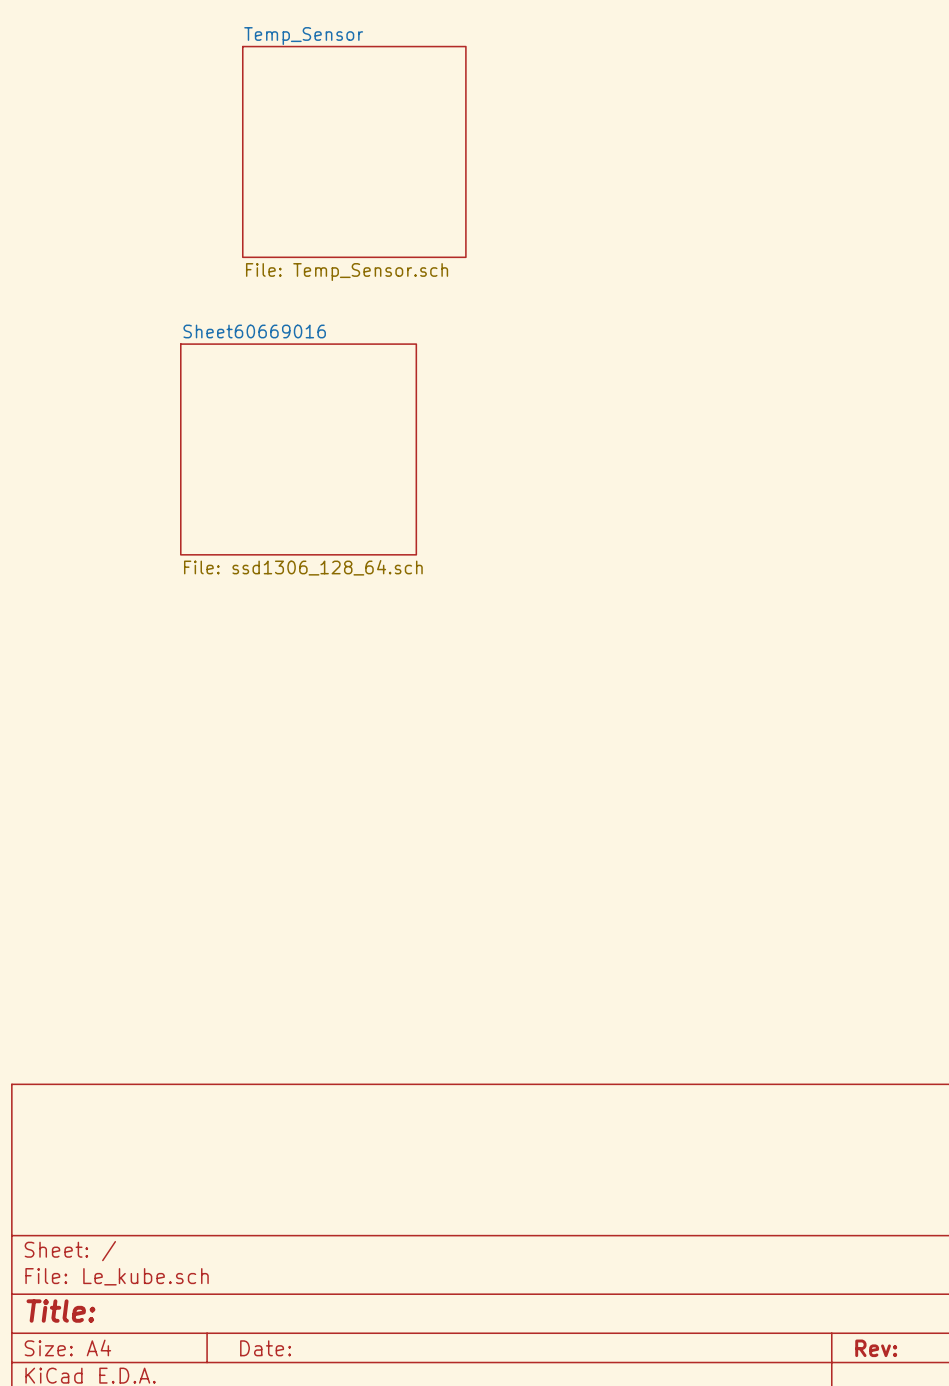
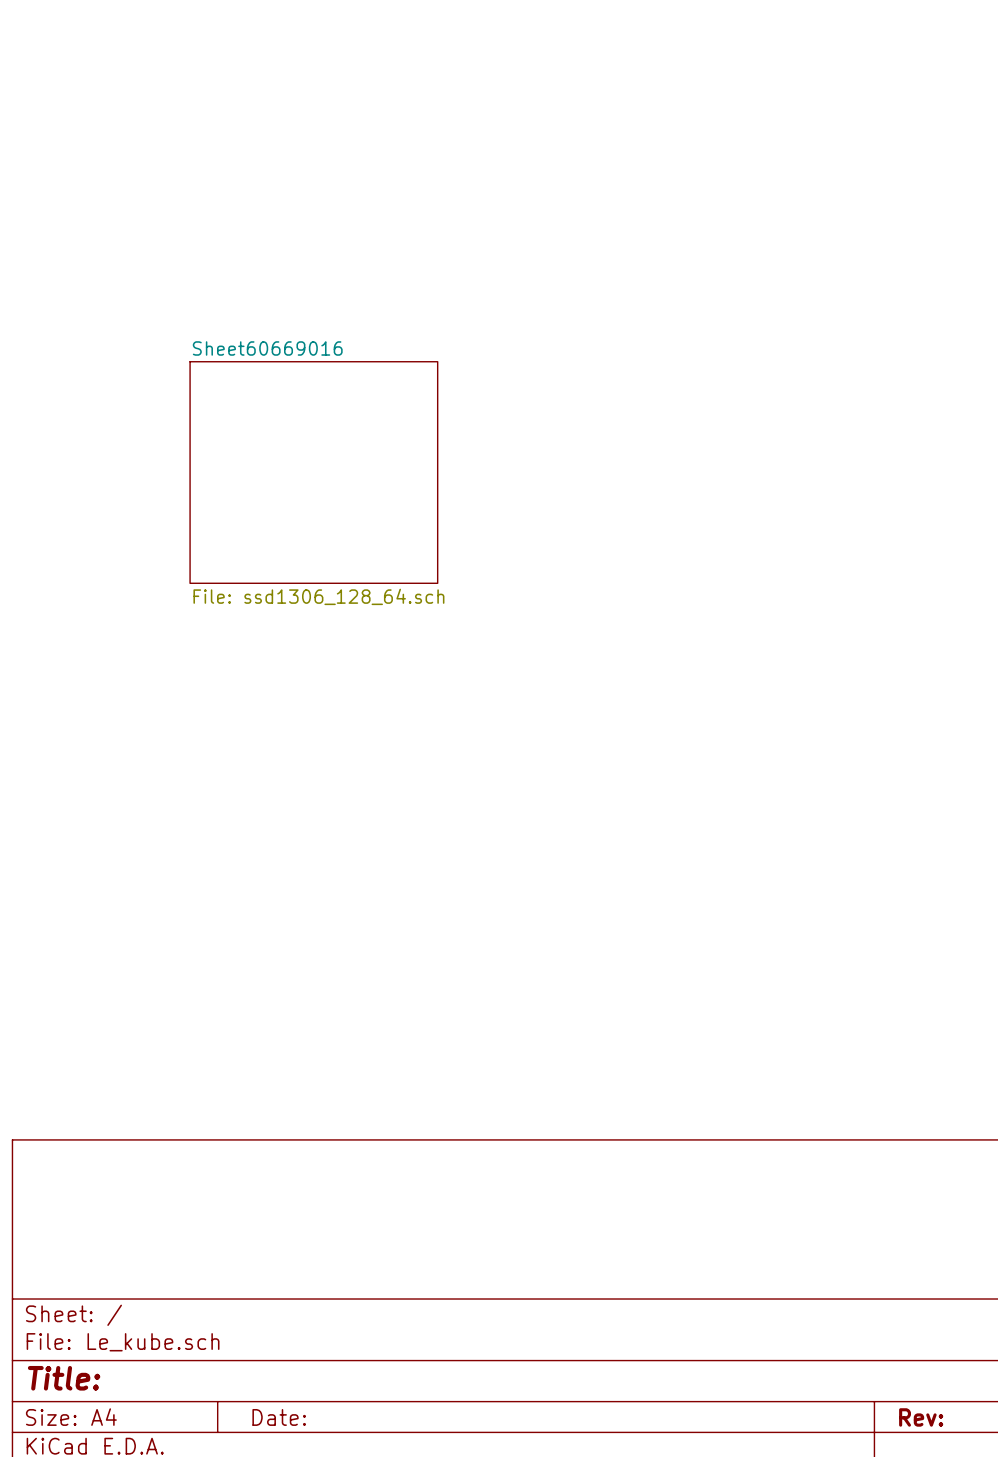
sheet Temp_Sensor: File: Temp_Sensor.sch (354, 151) -> none

